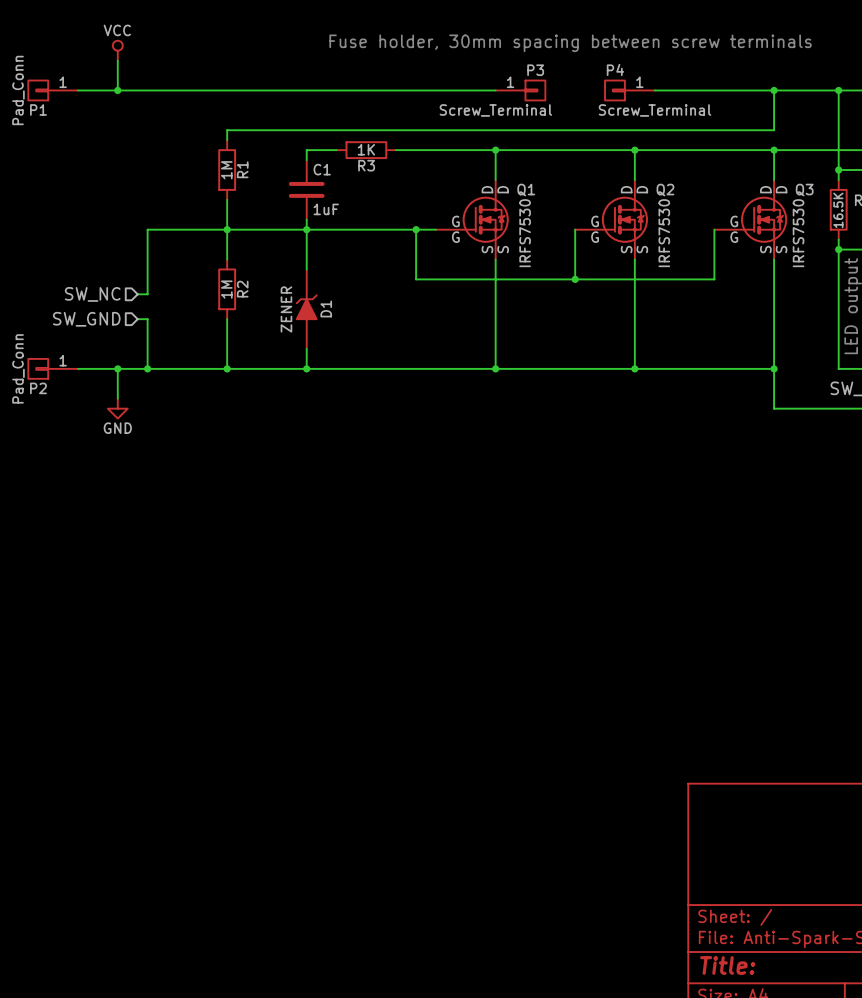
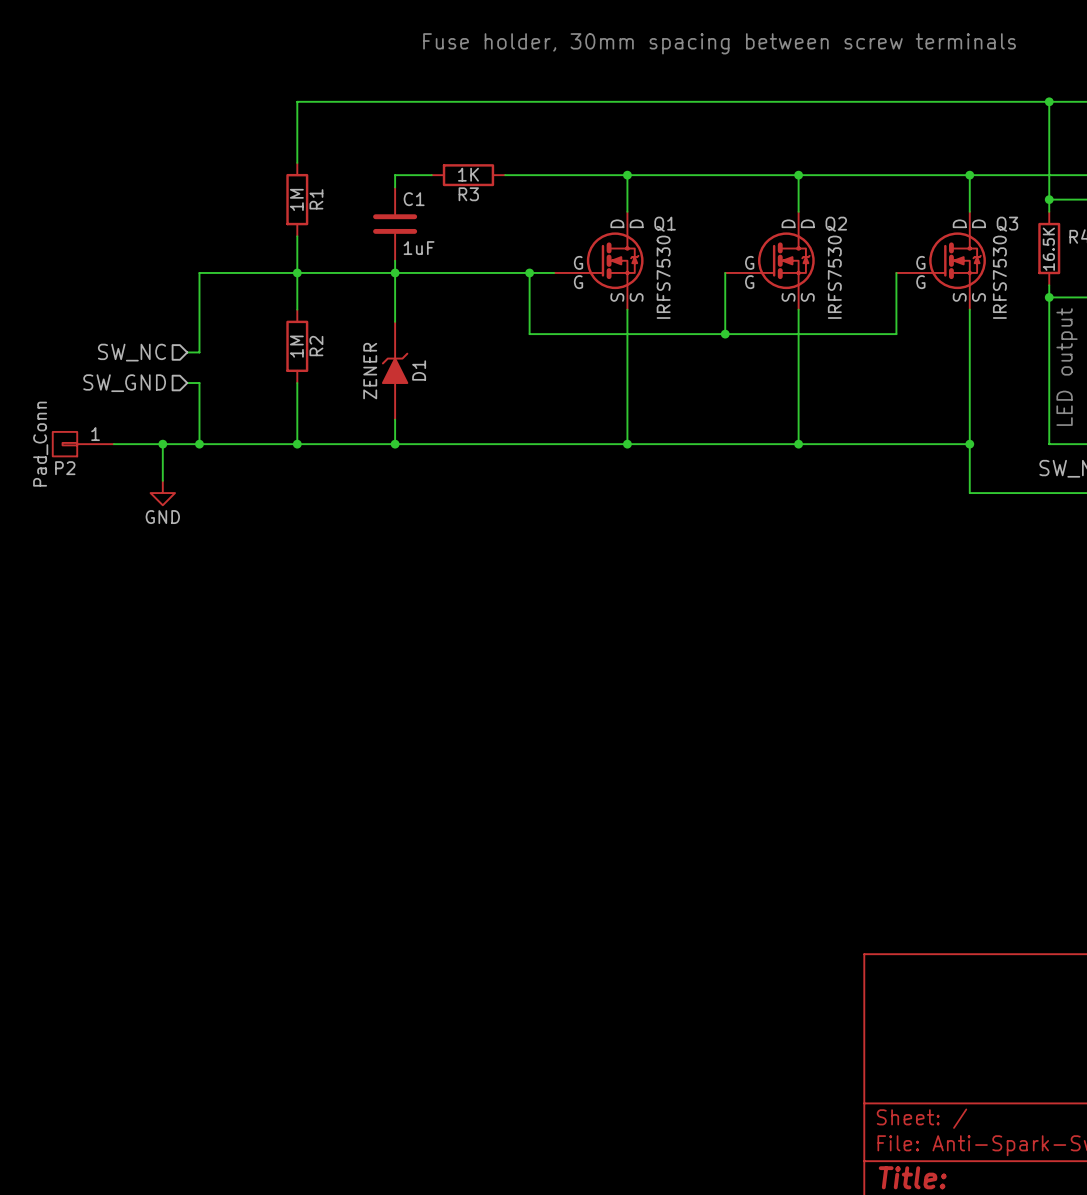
power symbol: VCC (117, 50) -> none
wire: (117, 60) (117, 90) -> none
P1: Pad_Conn (53, 90) -> none
wire: (78, 90) (227, 90) -> (297, 150) (297, 101)
junction: (117, 90) -> none
wire: none -> (627, 101) (823, 101)
P3: Screw_Terminal (520, 90) -> none
P4: Screw_Terminal (629, 90) -> none
wire: (774, 90) (774, 130) (227, 130) -> none
junction: (774, 90) -> none

